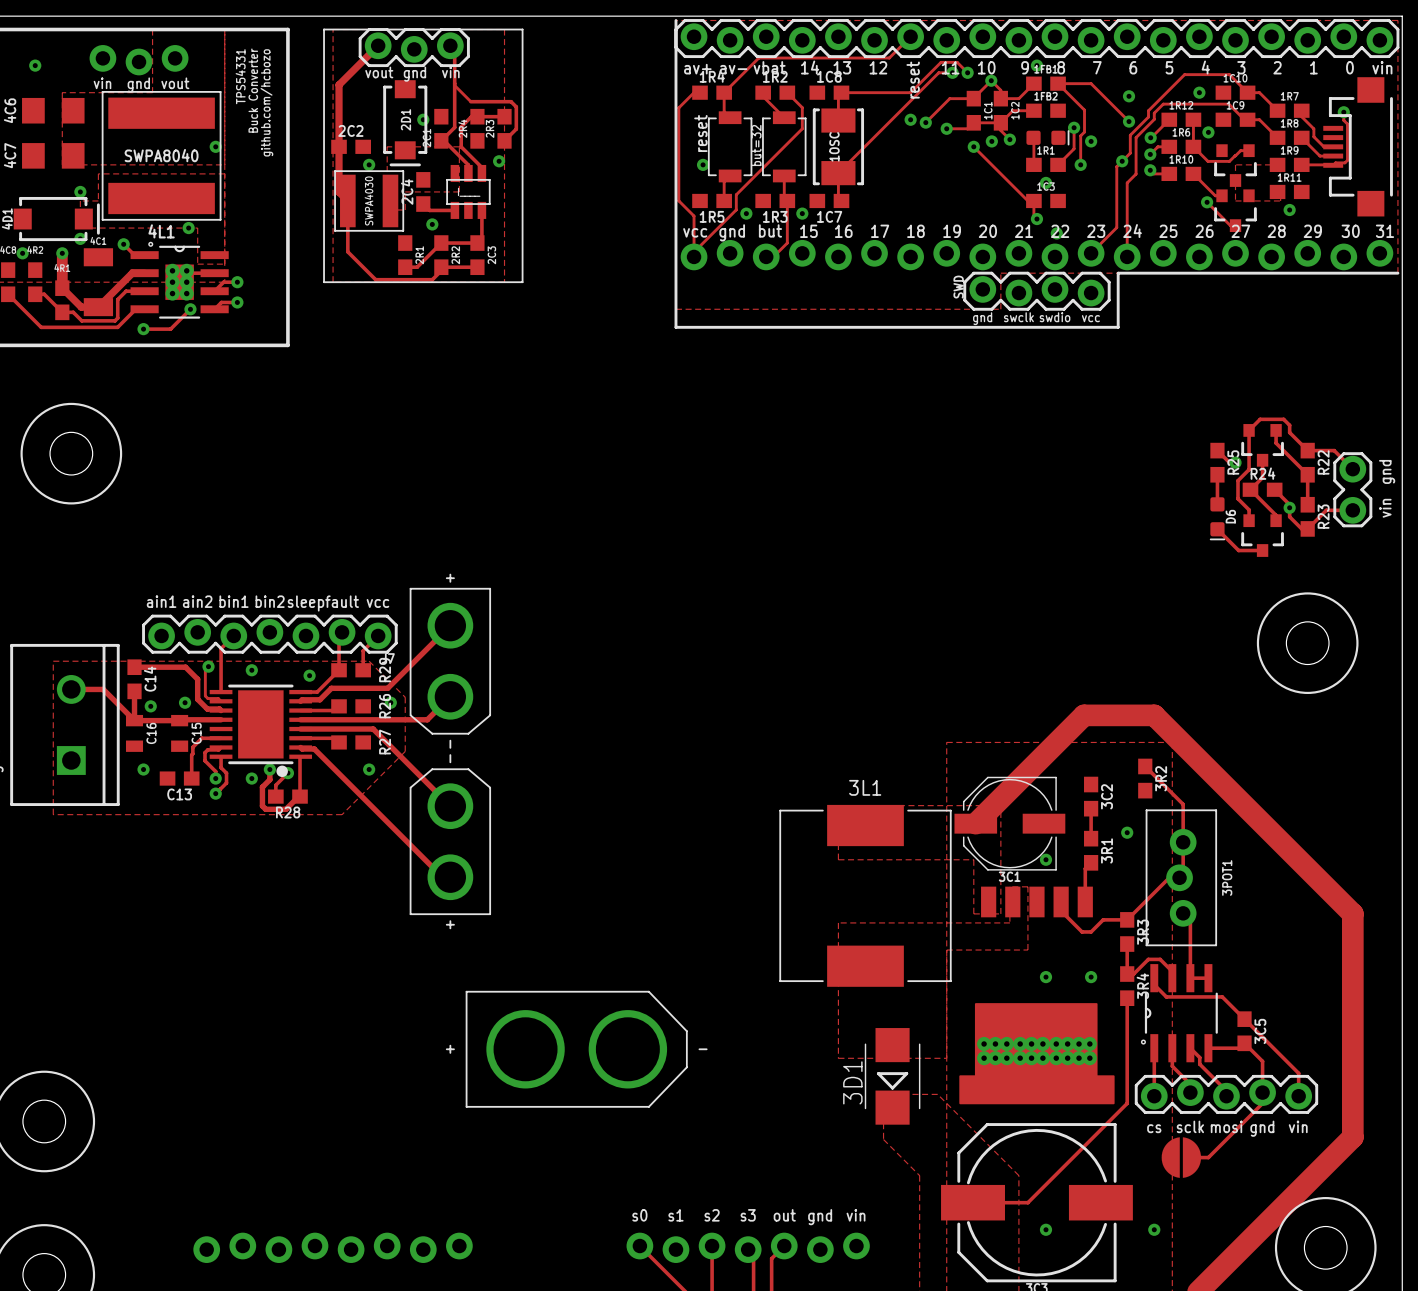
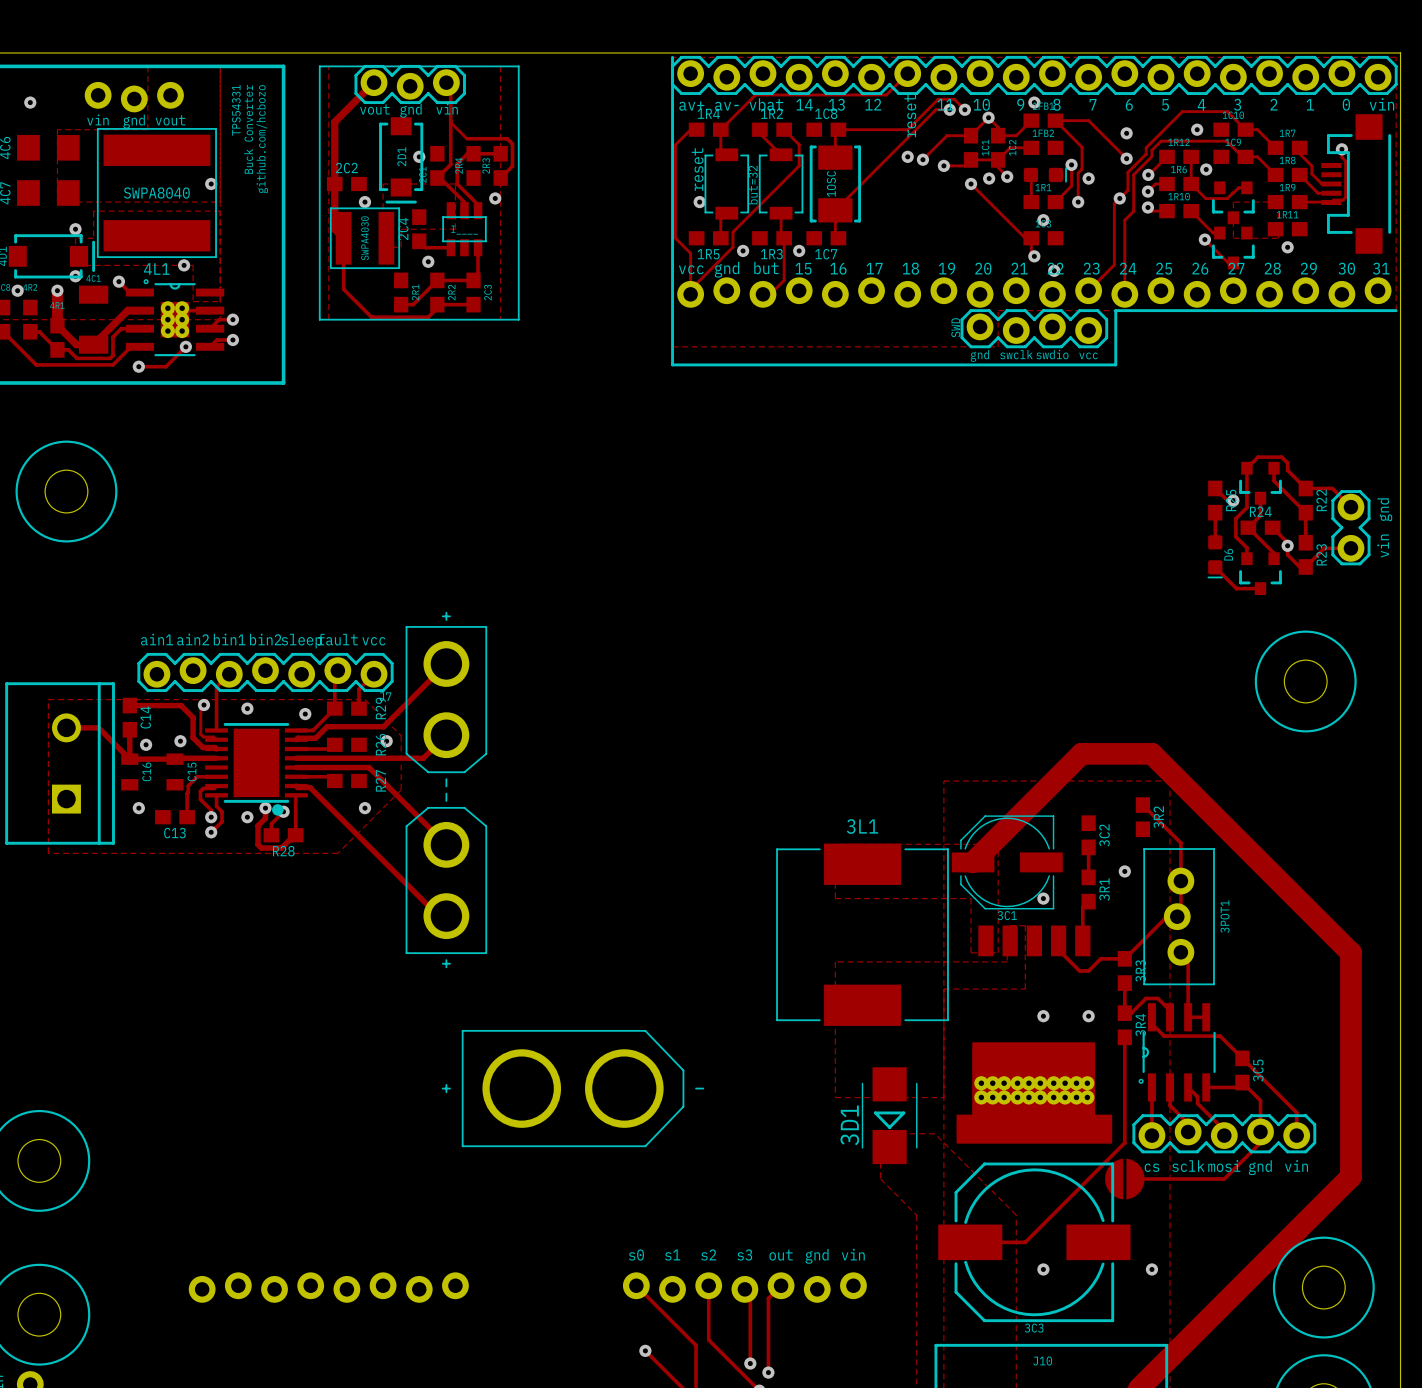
track: (1226, 1139) (1208, 1157) (1199, 1157) -> (1224, 1179) (1142, 1179)
part position: (1181, 1157) -> (1124, 1179)

